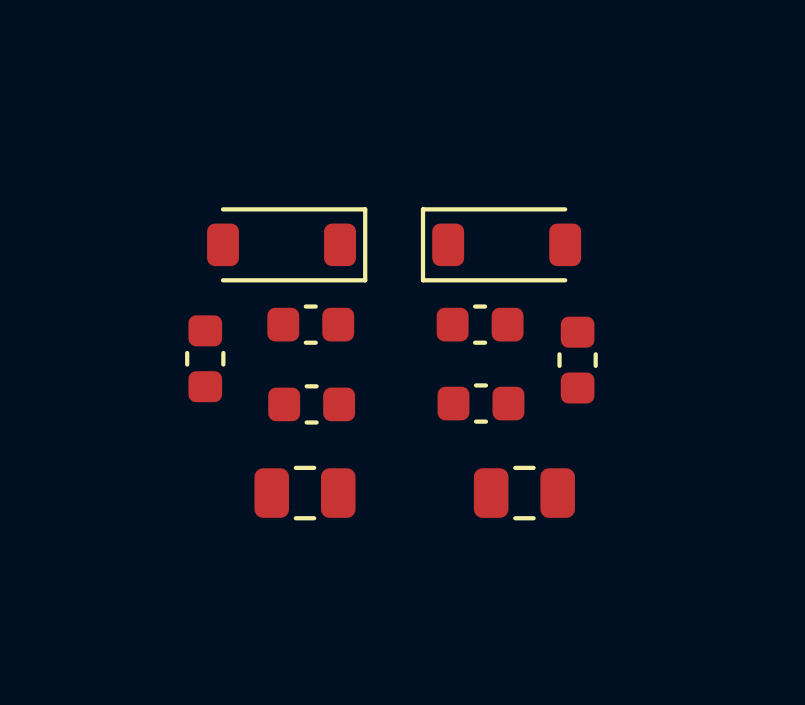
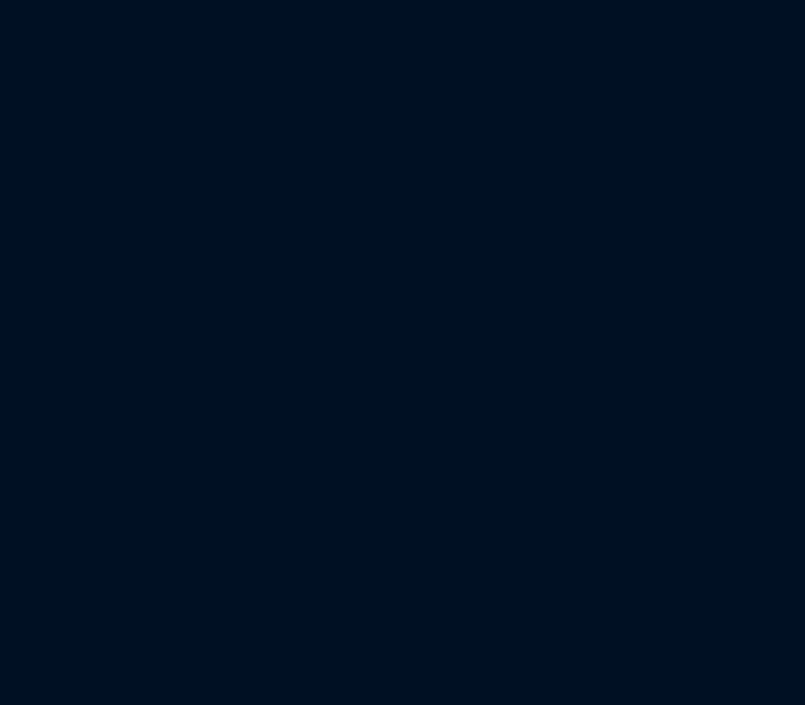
part: (287, 244) -> none
part: (501, 244) -> none
part: (310, 324) -> none
part: (480, 324) -> none
part: (205, 358) -> none
part: (577, 360) -> none
part: (480, 403) -> none
part: (311, 404) -> none
part: (305, 493) -> none
part: (524, 493) -> none

